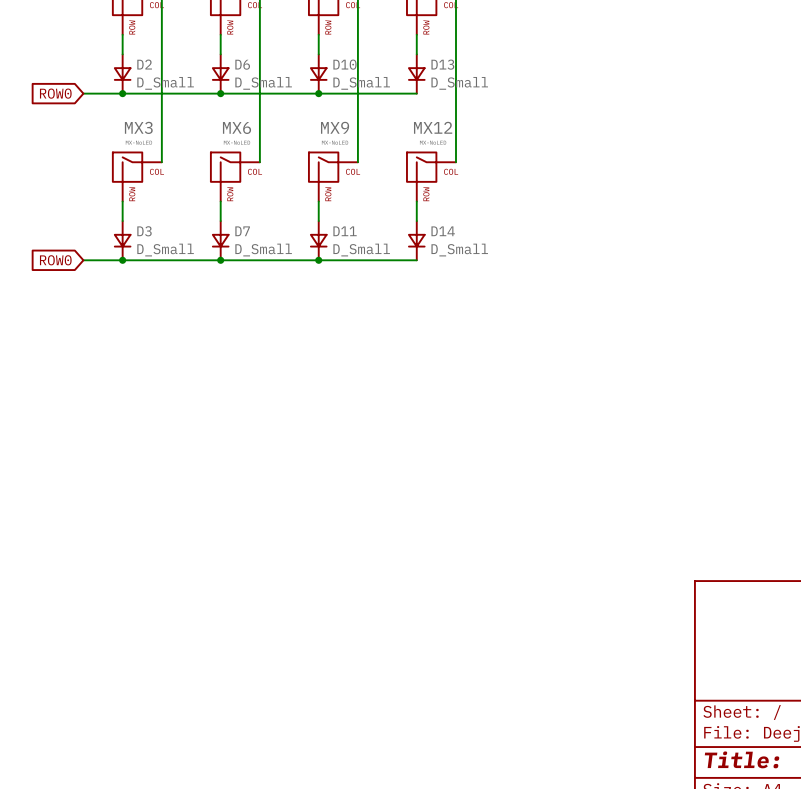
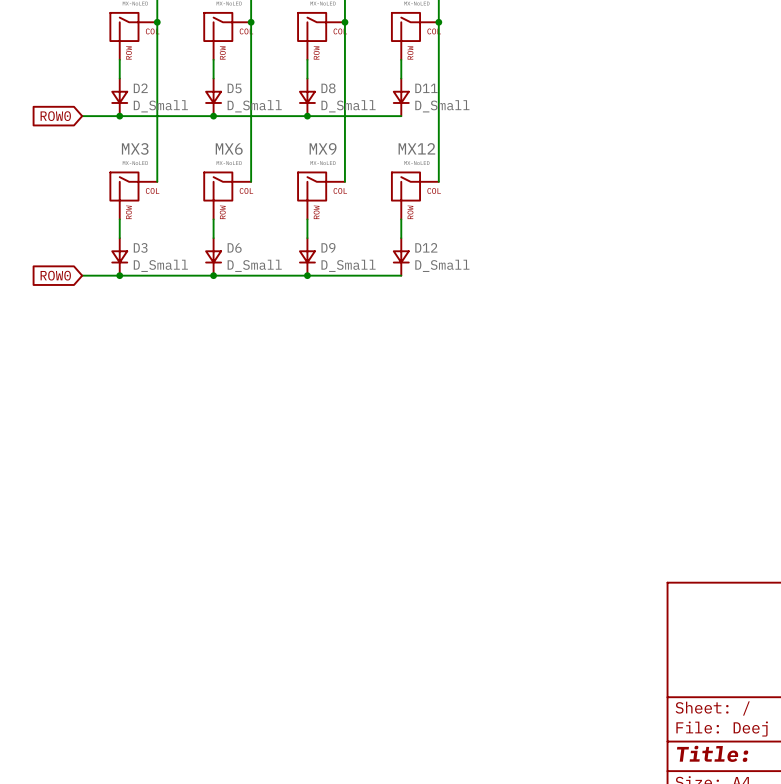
D6 name: D6 (242, 64) -> D5 (234, 88)
D10 name: D10 (344, 64) -> D8 (328, 88)
D13 name: D13 (442, 64) -> D11 (426, 88)
D7 name: D7 (242, 231) -> D6 (234, 247)
D11 name: D11 (345, 231) -> D9 (328, 247)
D14 name: D14 (443, 231) -> D12 (426, 247)

